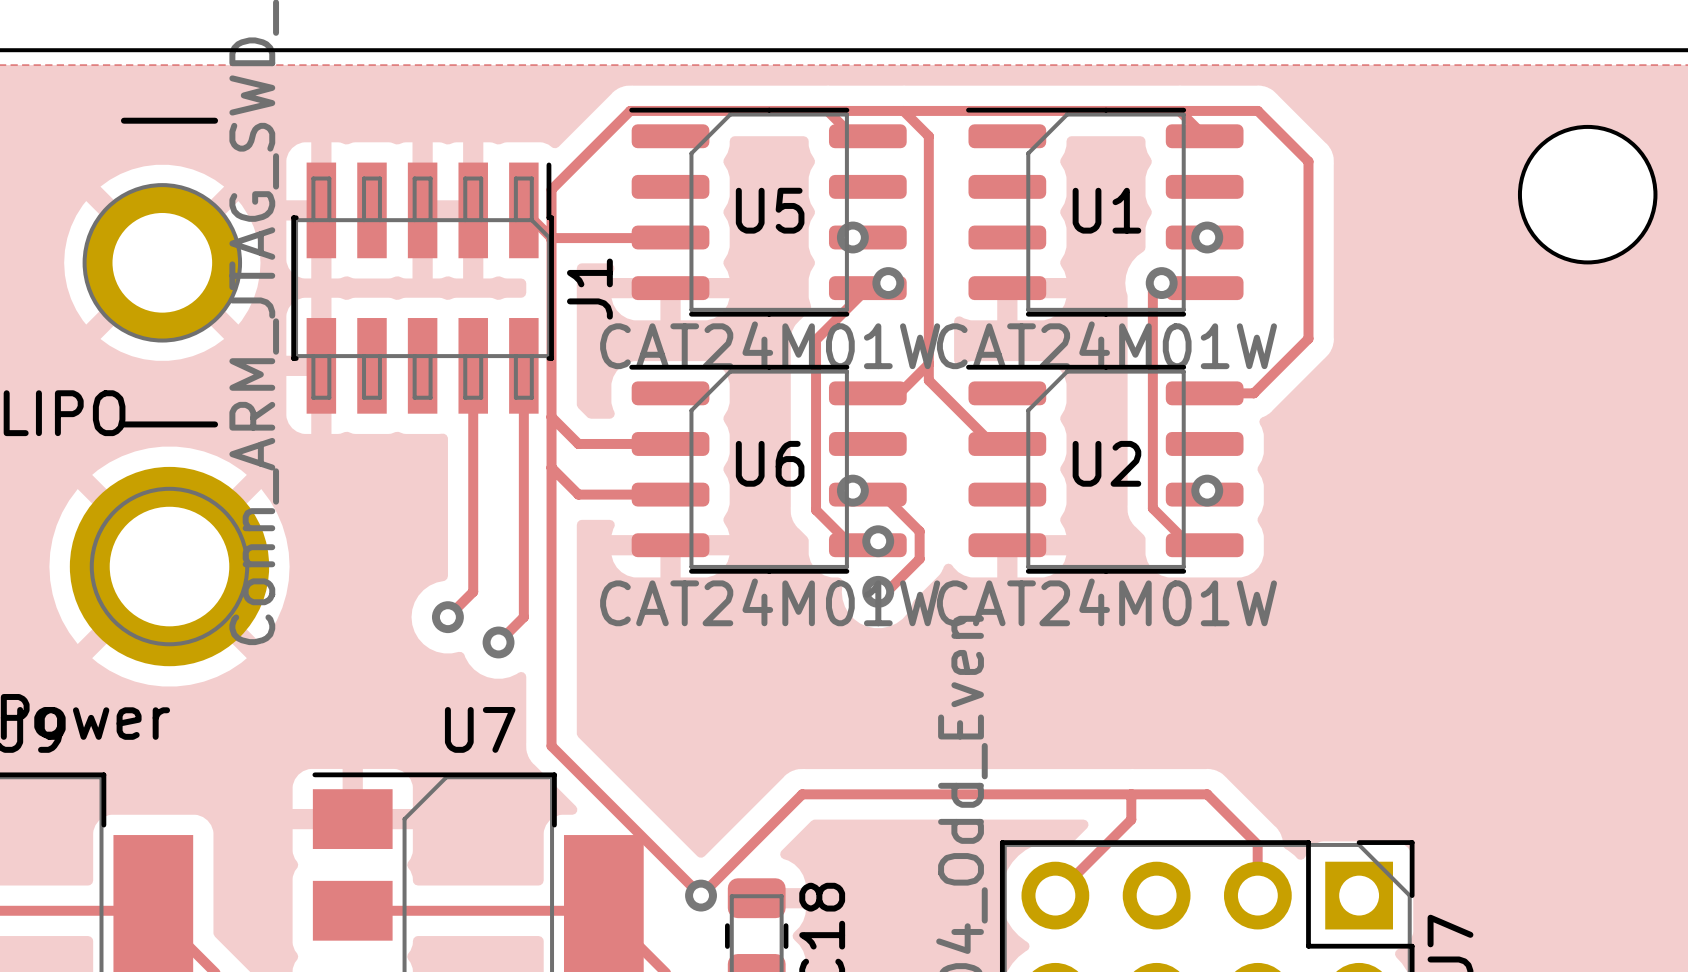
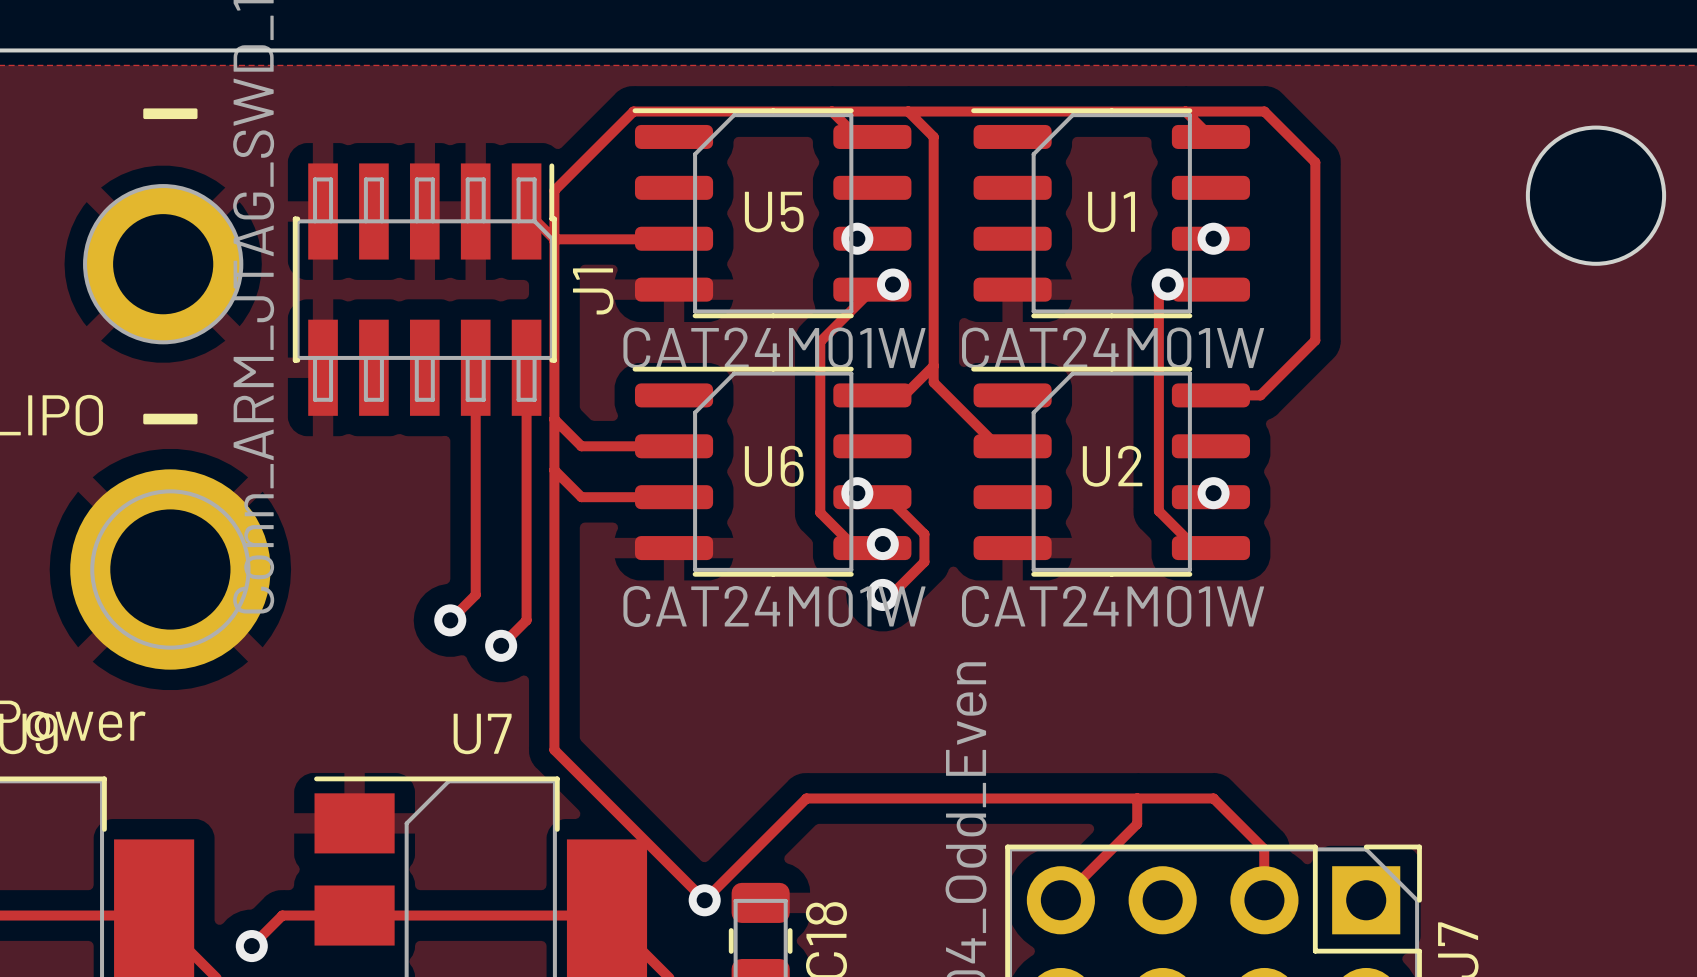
track: none -> (354, 915) (282, 915) (251, 946)
via: none -> (251, 946)

